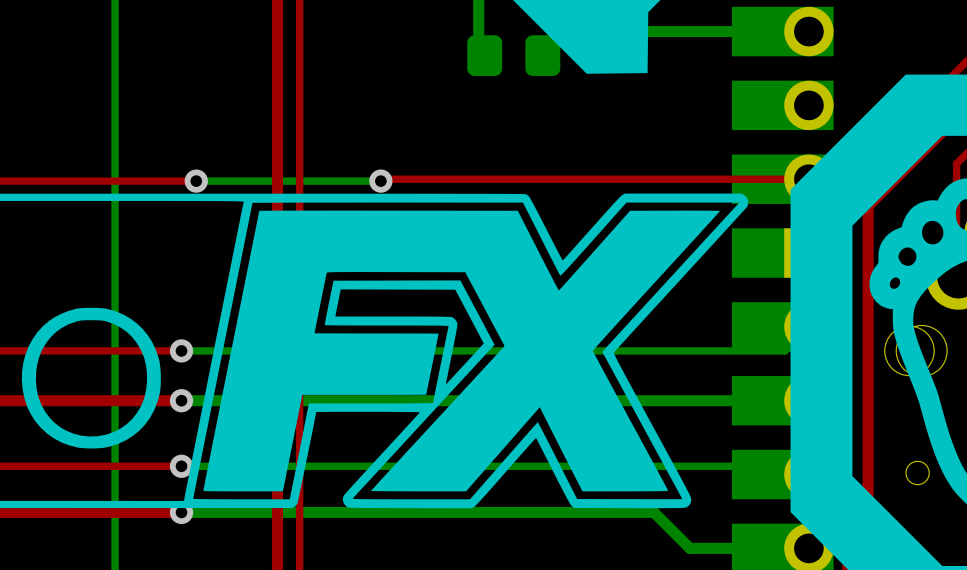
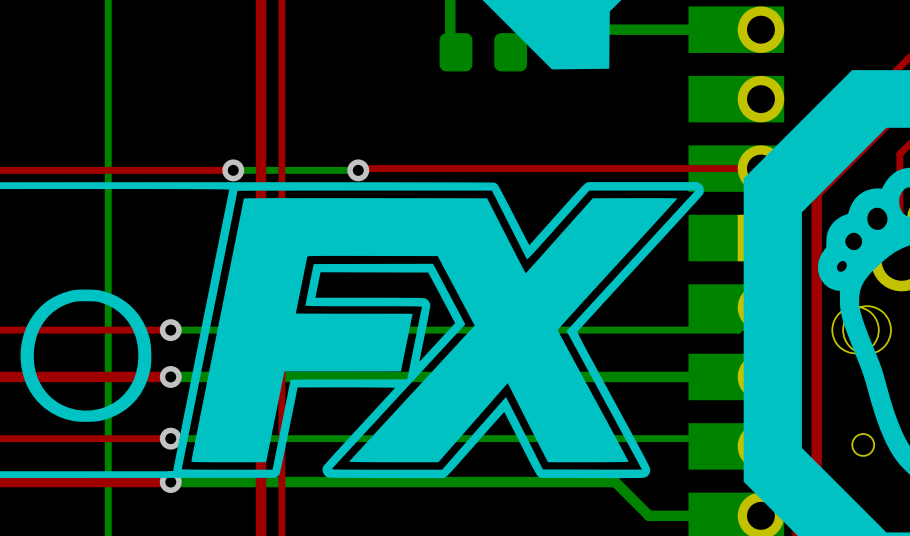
top track: none -> (184, 170) (233, 170)
bottom track: (196, 181) (247, 181) -> none
via position: (196, 181) -> (233, 170)

